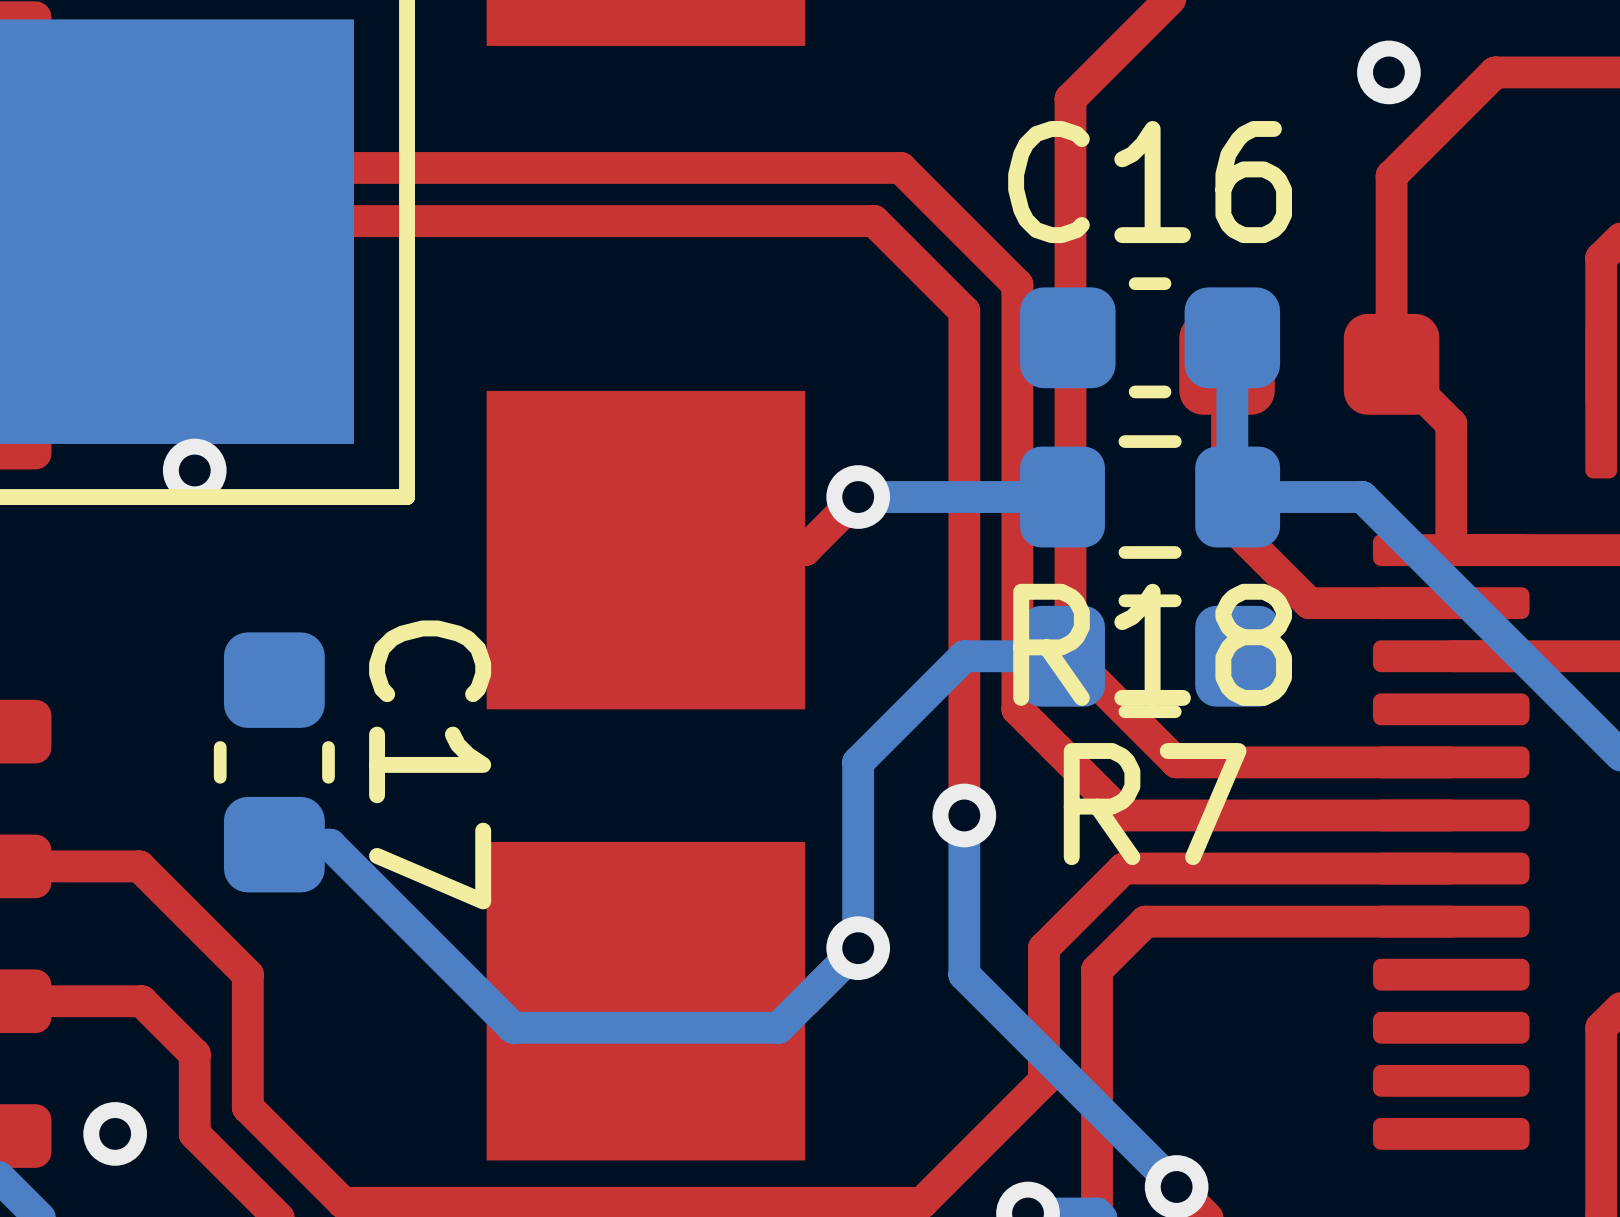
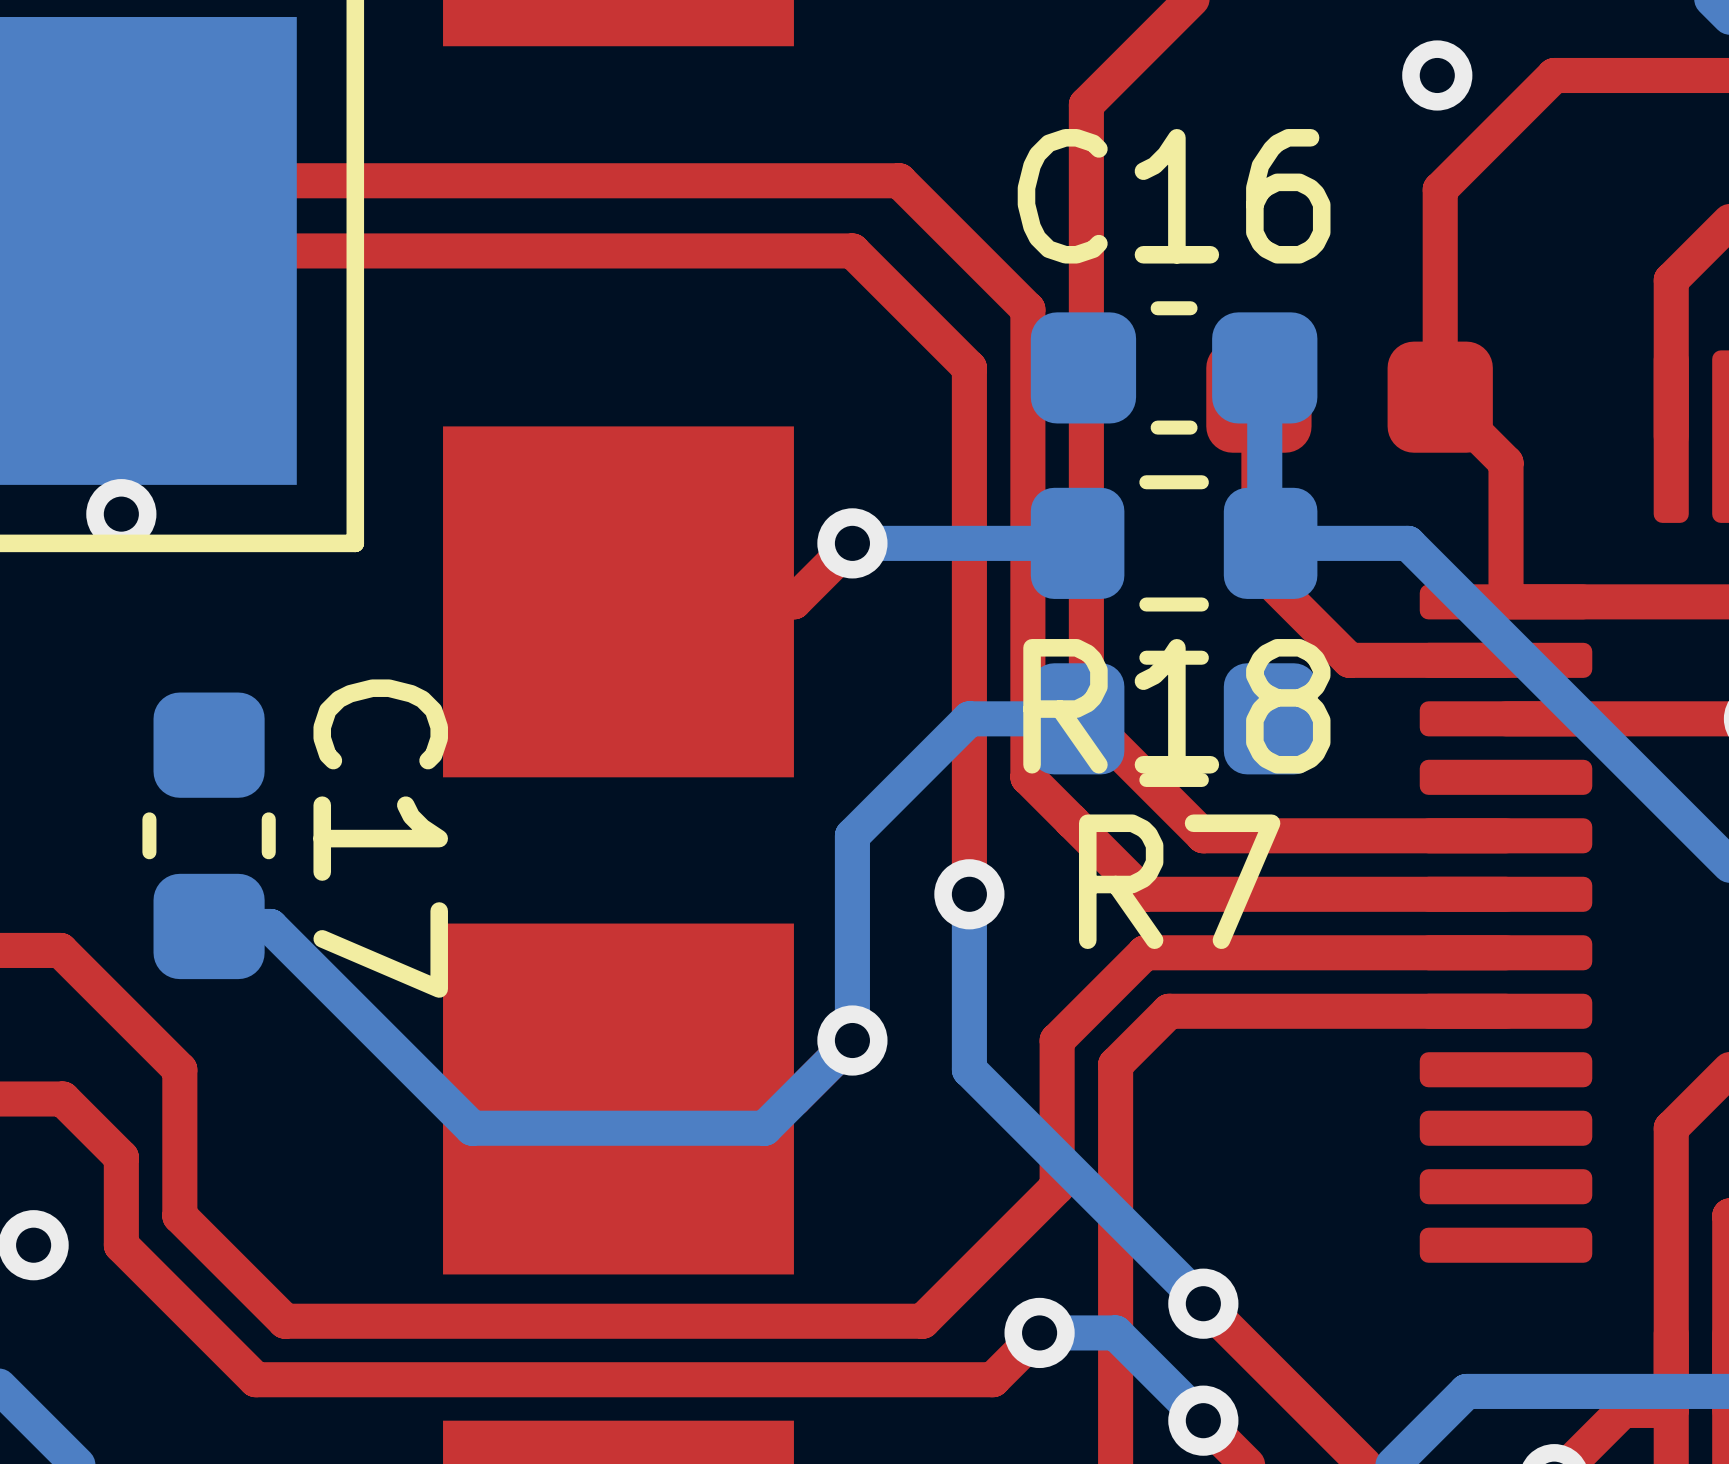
top track: (194, 231) (205, 221) (874, 221) (964, 311) (964, 337) -> (121, 250) (852, 250) (969, 367)

